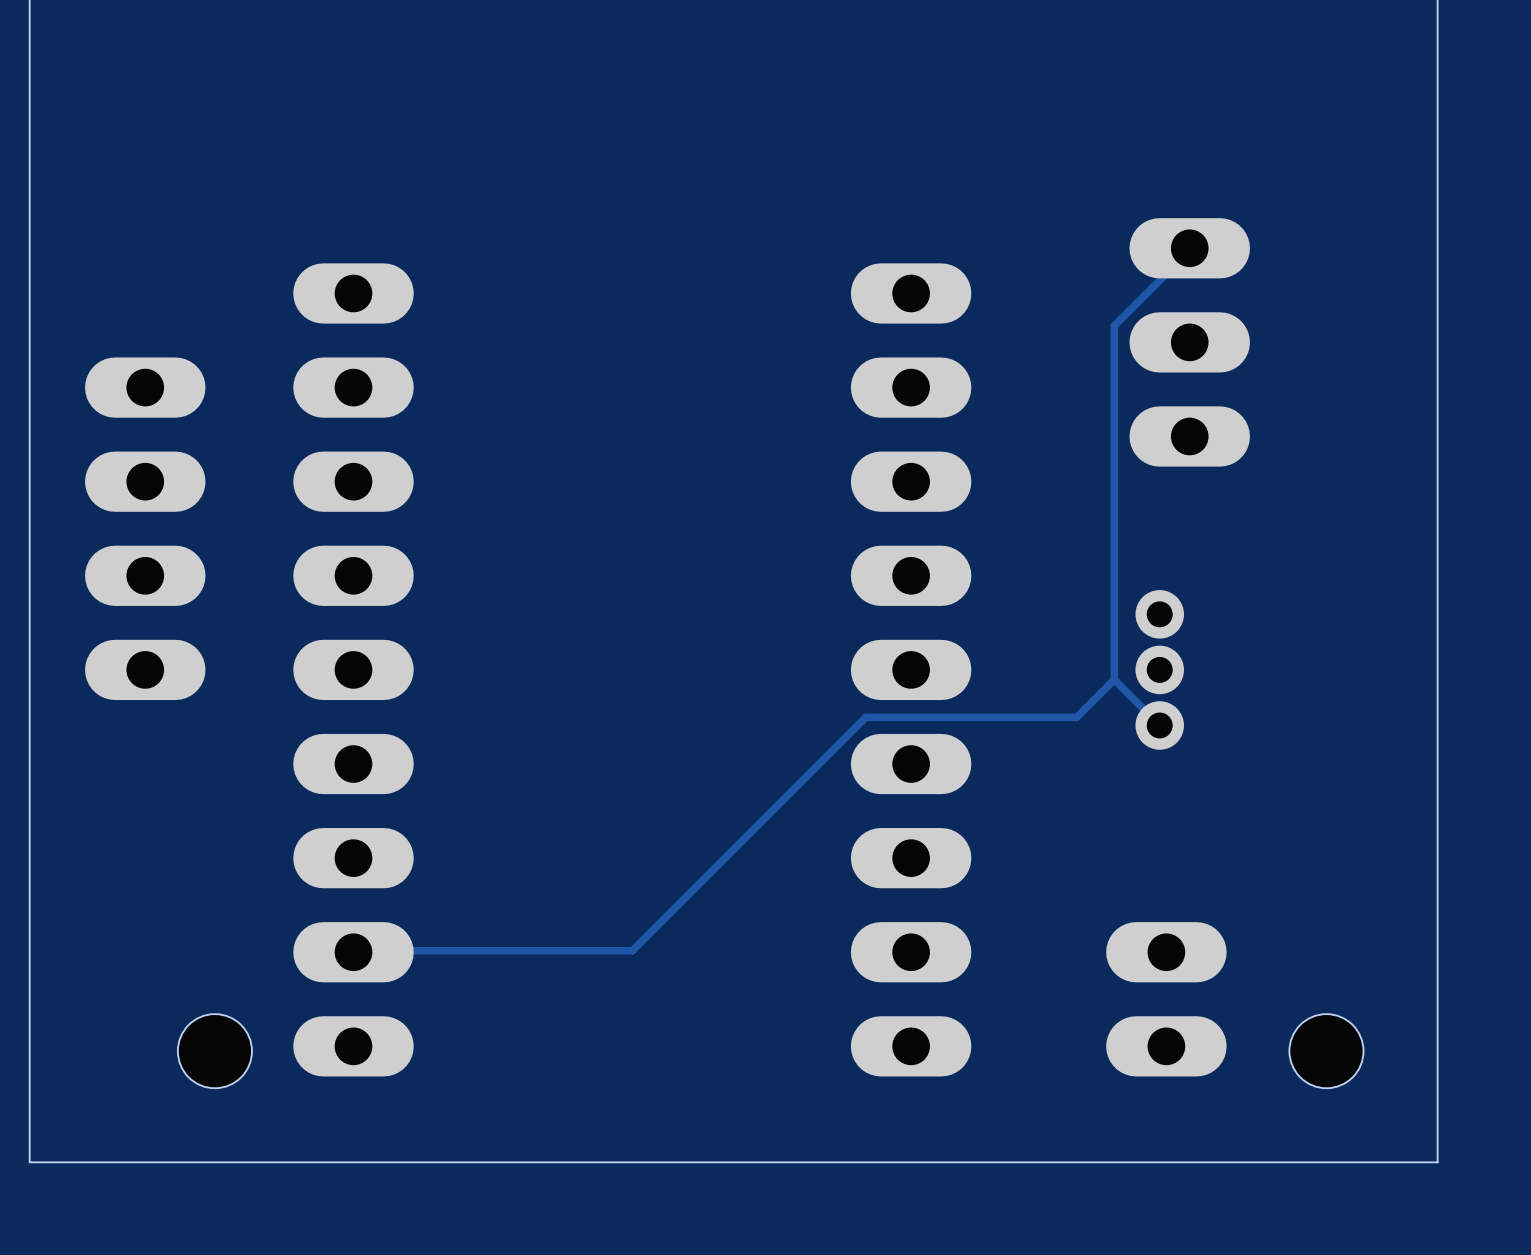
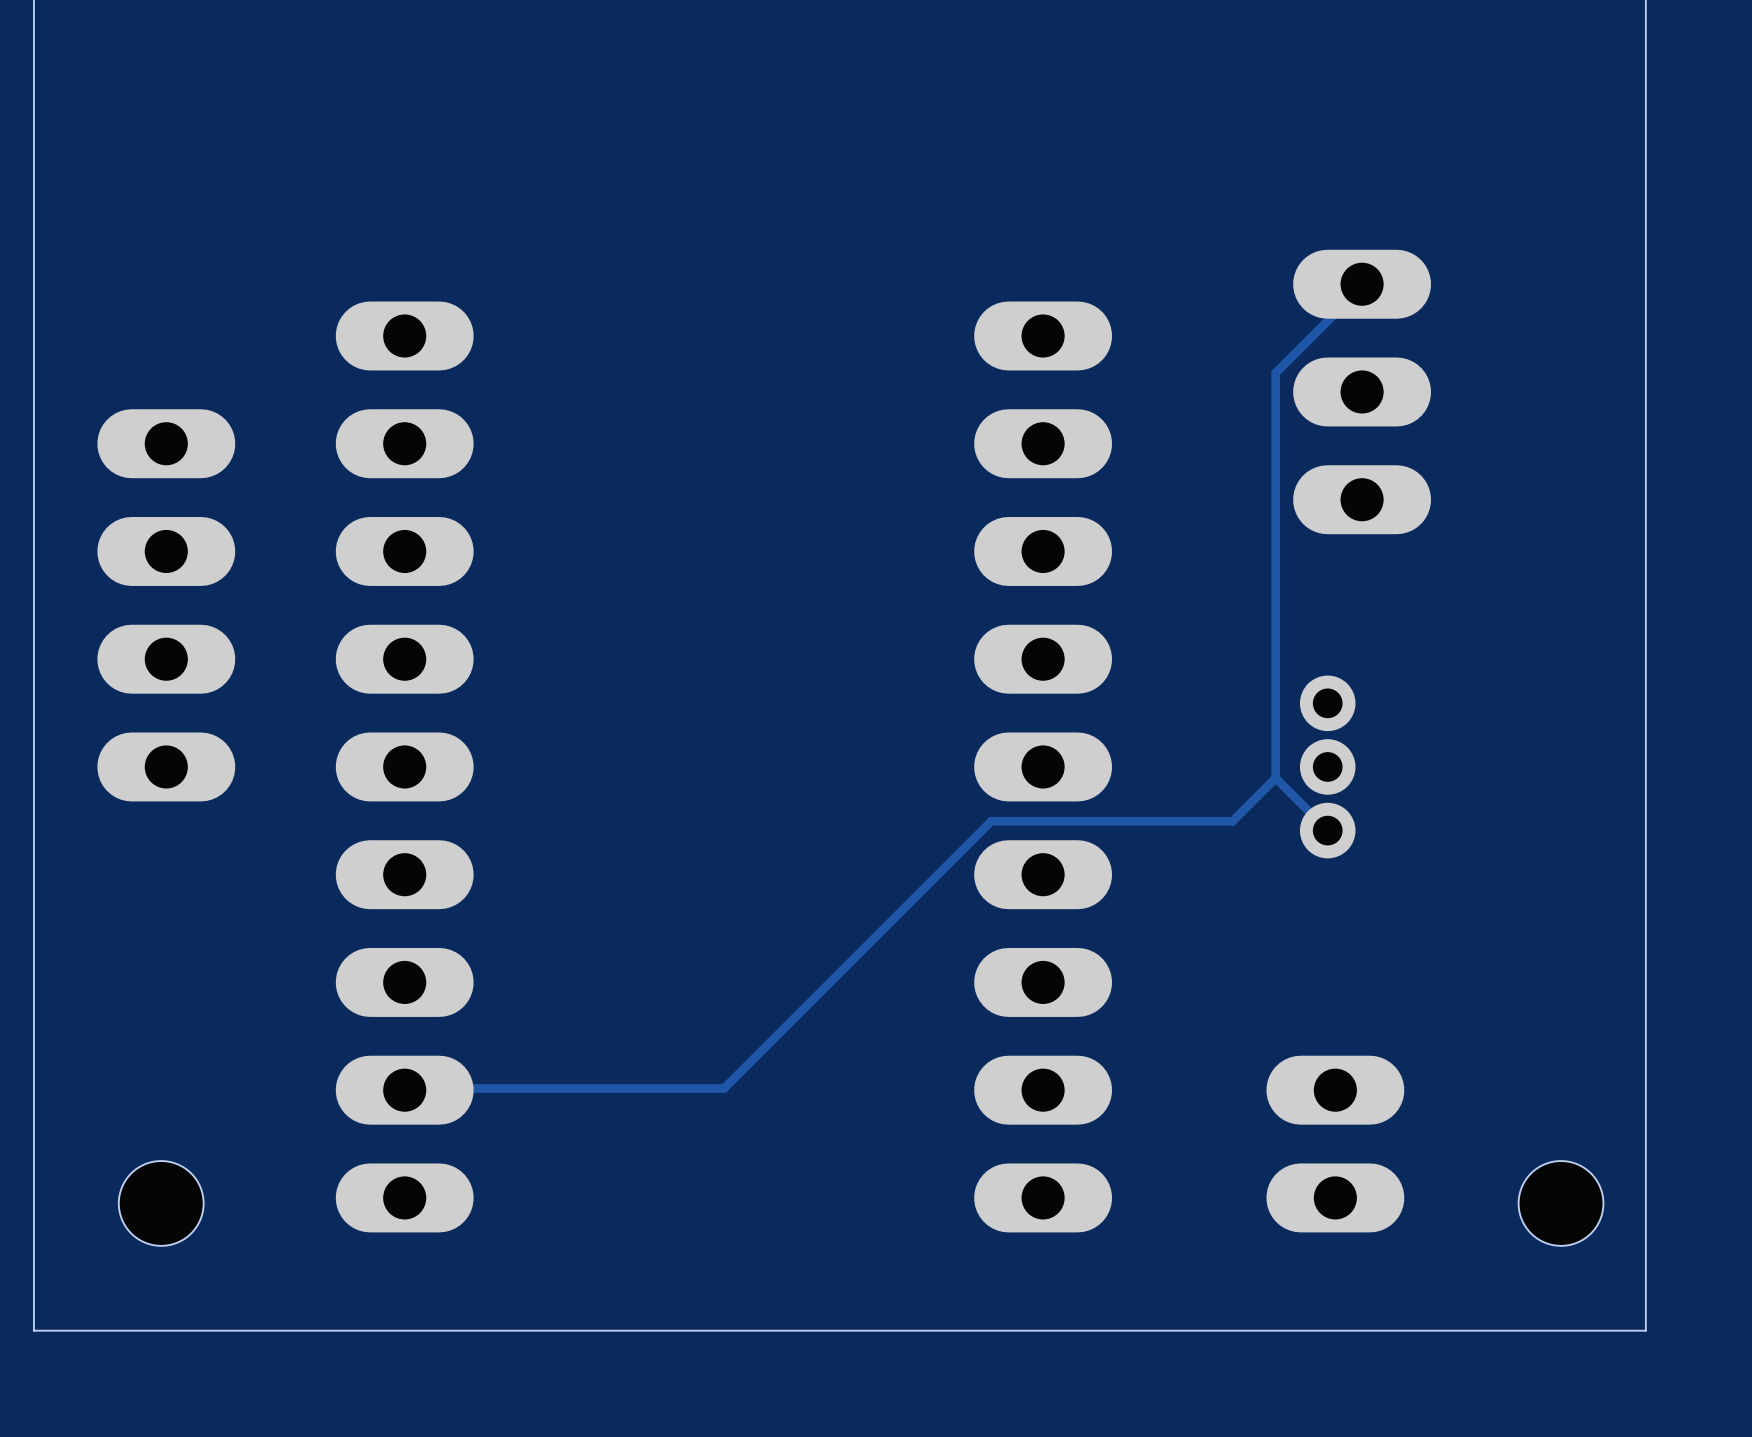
hole position: (214, 1051) -> (161, 1203)
hole position: (1326, 1051) -> (1561, 1203)

